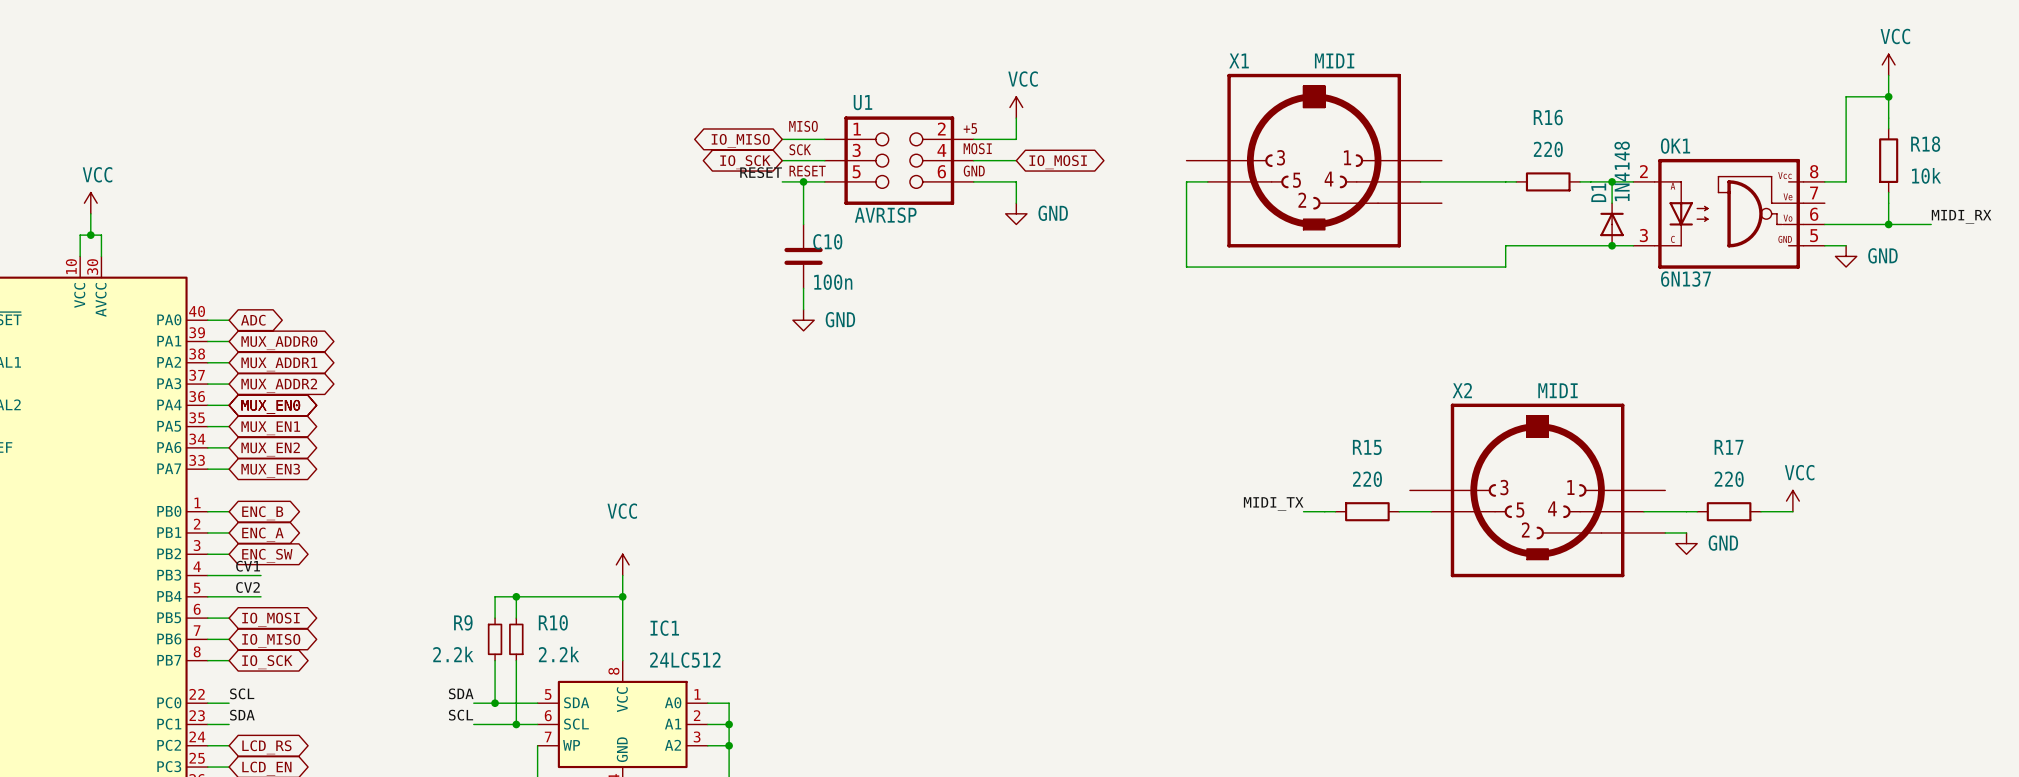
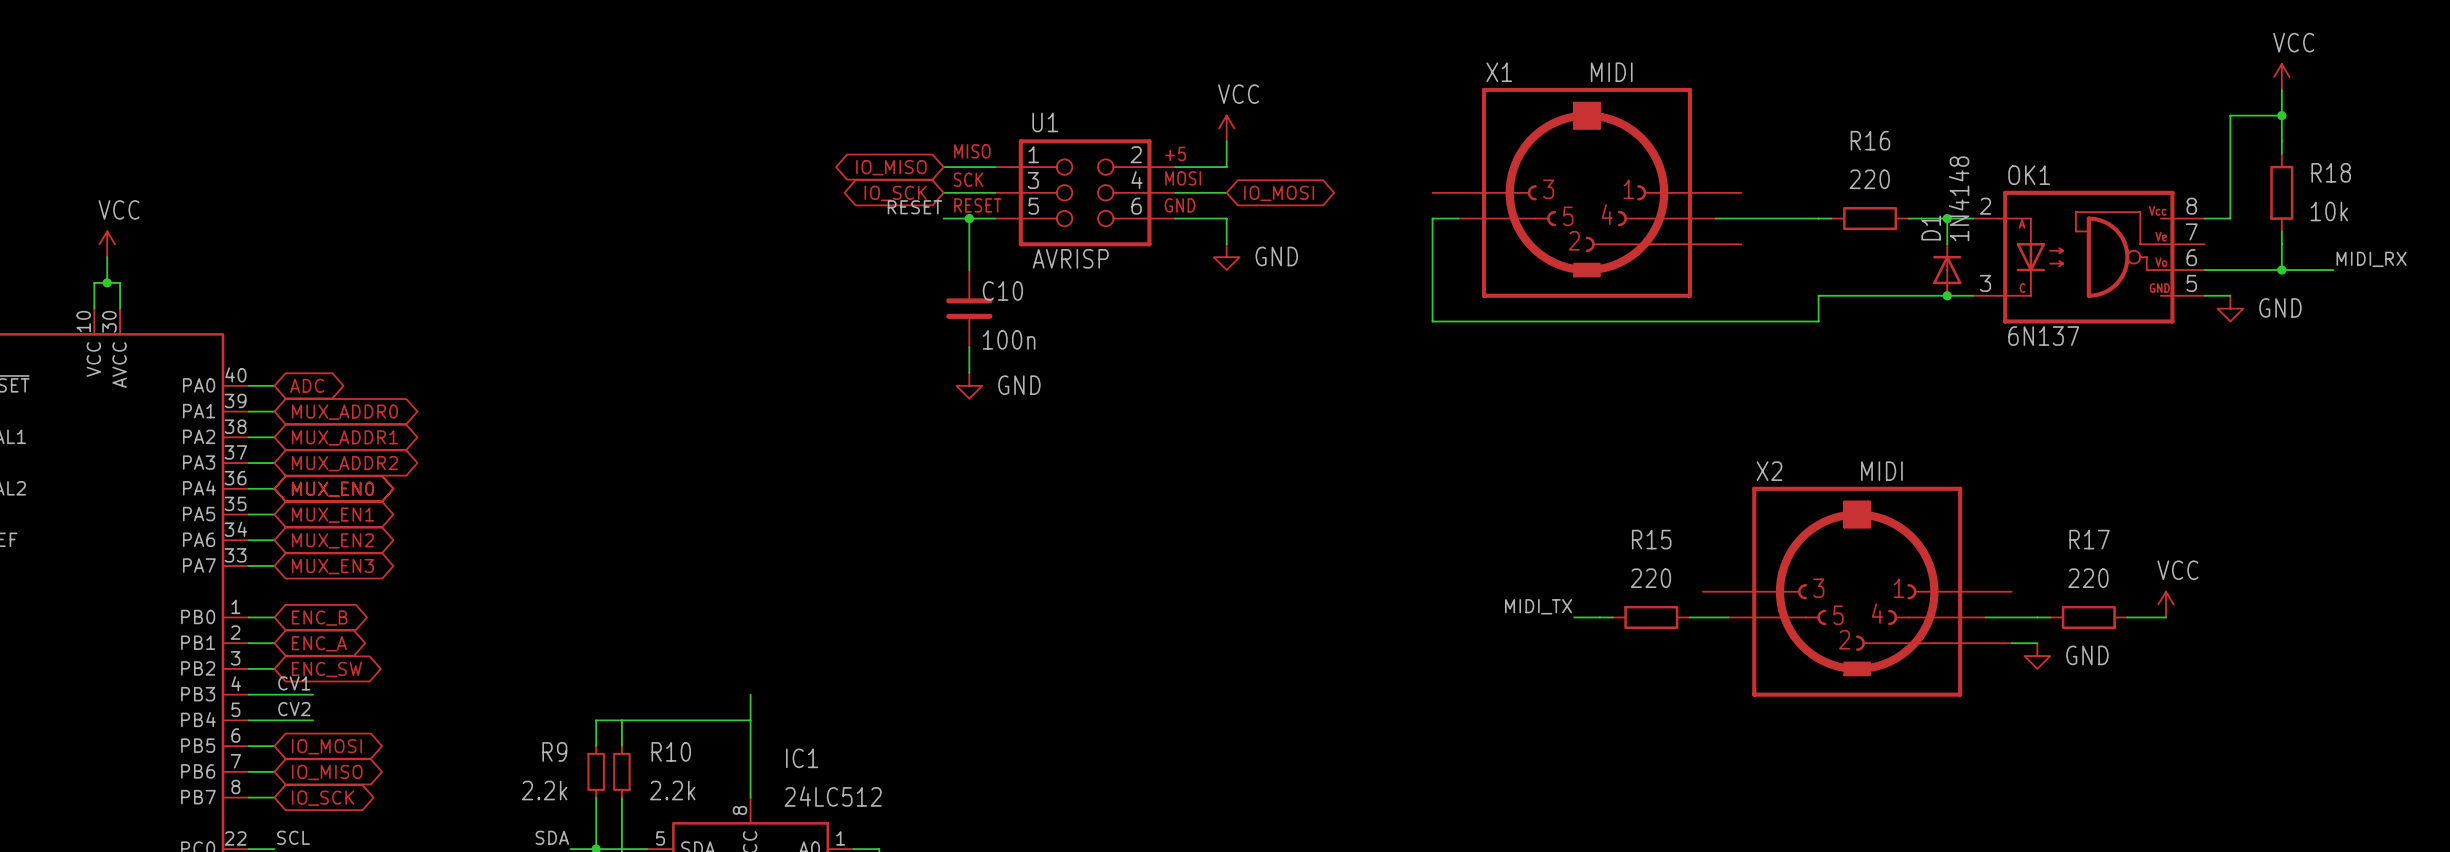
power symbol: VCC (622, 564) -> none
junction: (516, 596) -> none
junction: (622, 596) -> none

